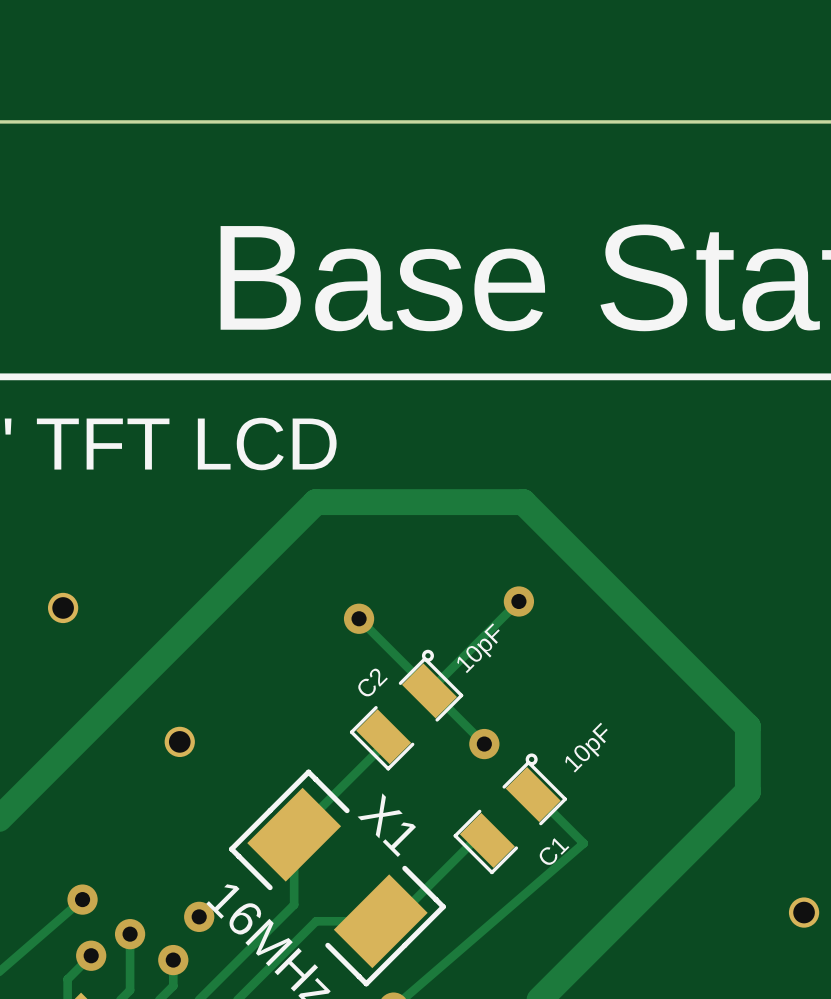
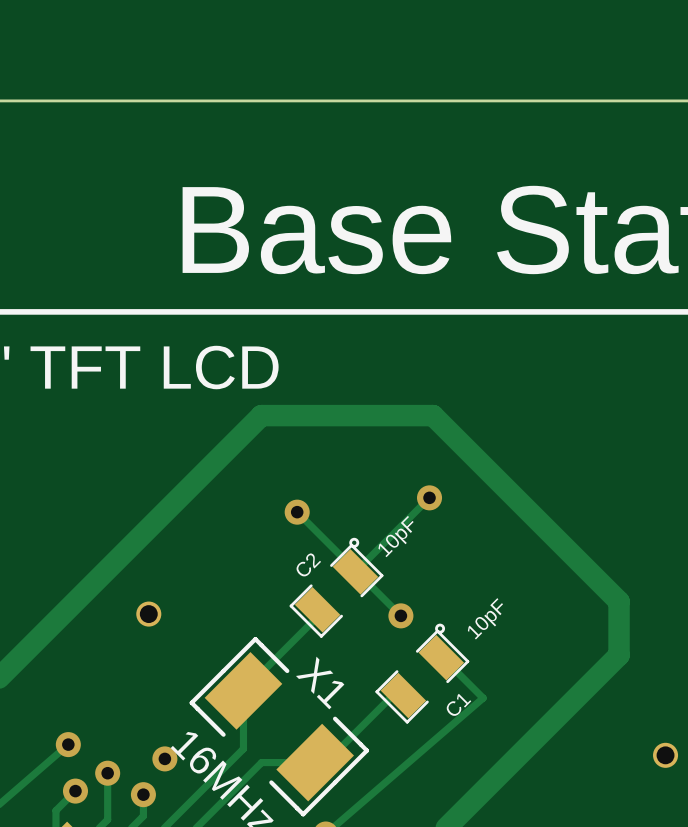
part: (63, 607) -> none

